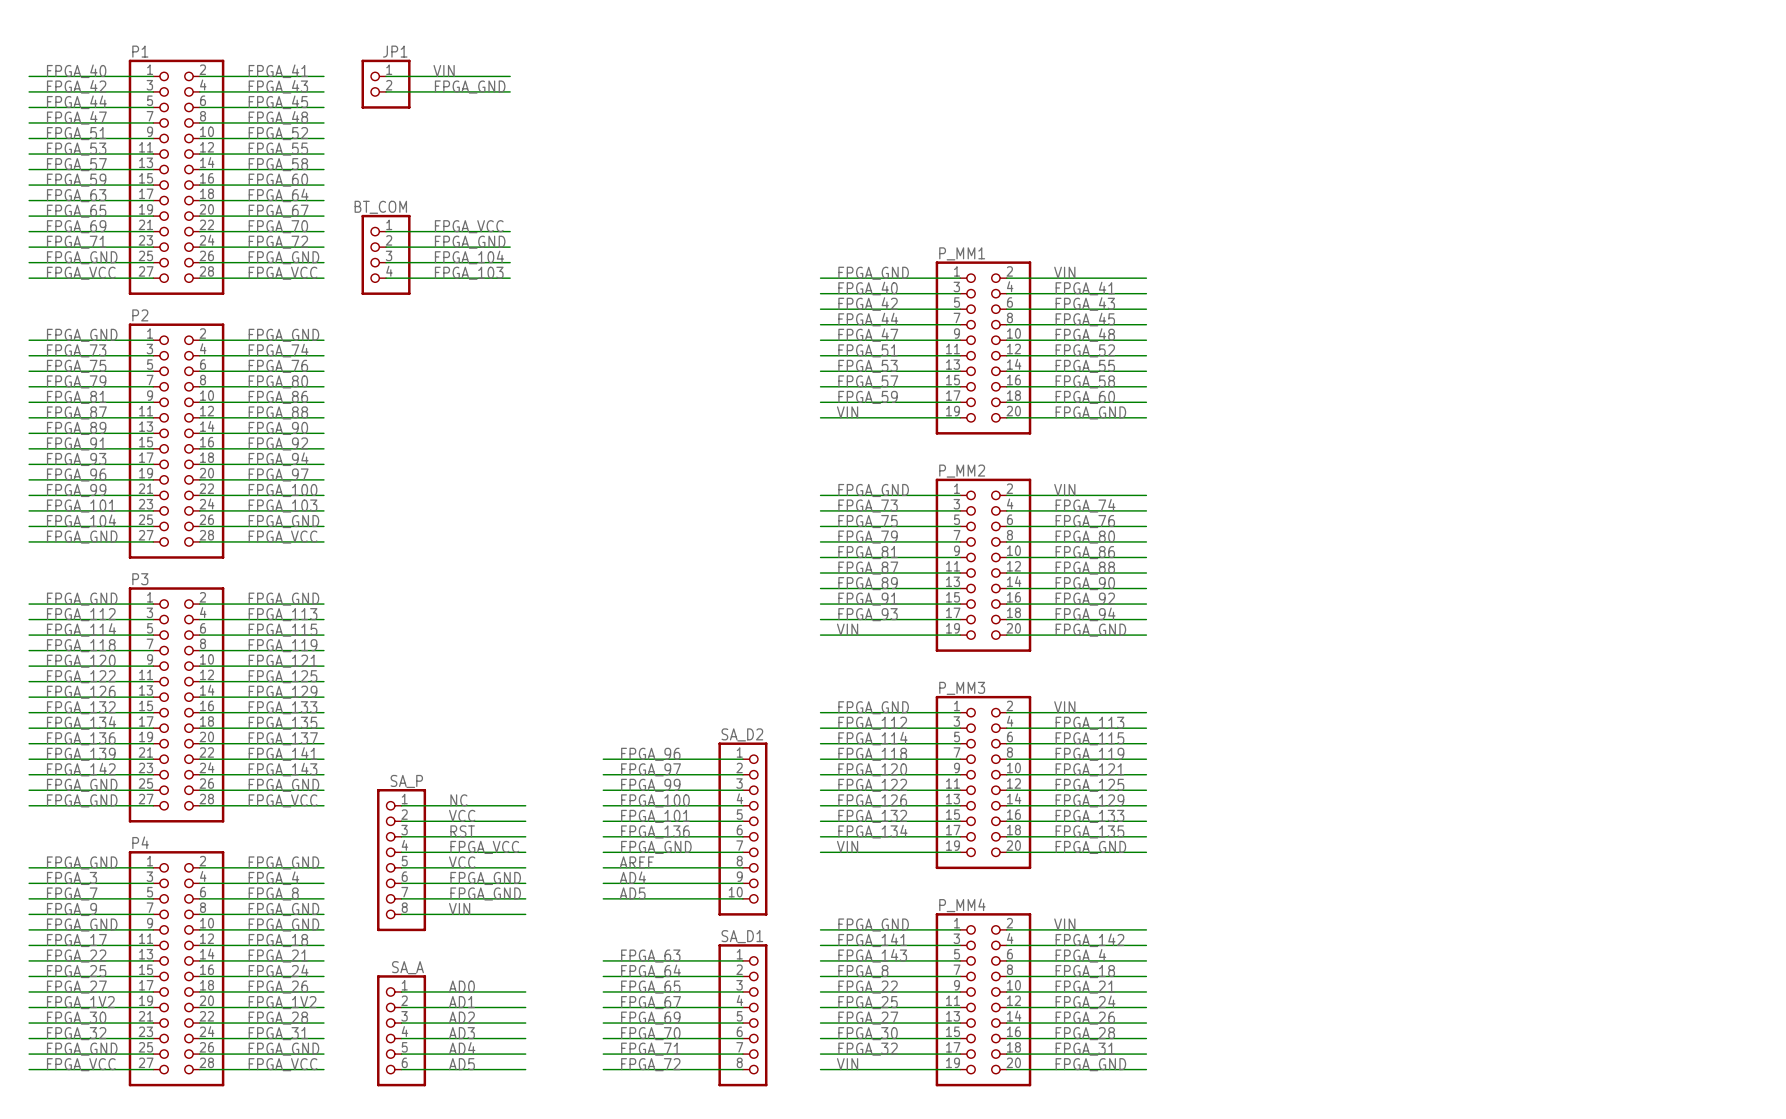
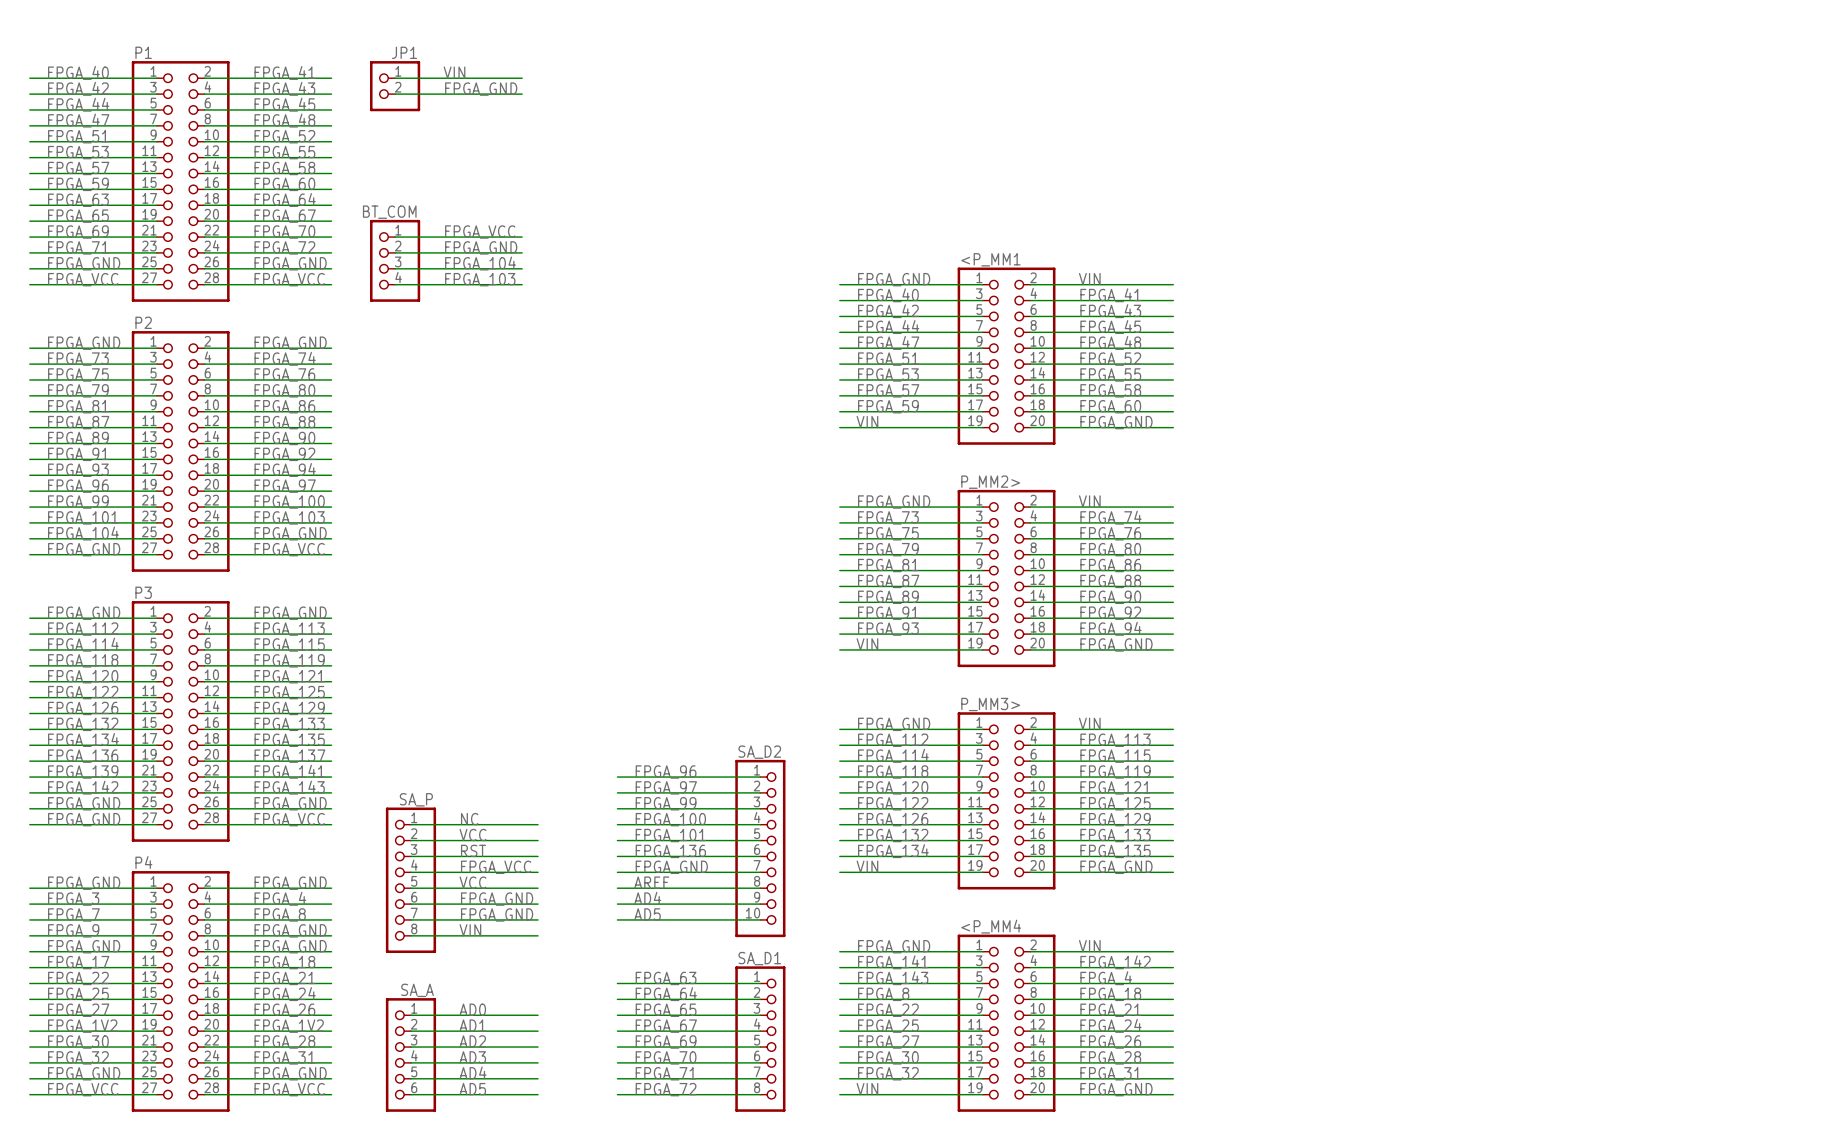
P_MM1 name: P_MM1 (962, 253) -> <P_MM1 (990, 259)
P_MM2 name: P_MM2 (962, 471) -> P_MM2> (990, 482)
P_MM3 name: P_MM3 (962, 688) -> P_MM3> (990, 704)
P_MM4 name: P_MM4 (962, 905) -> <P_MM4 (991, 926)

